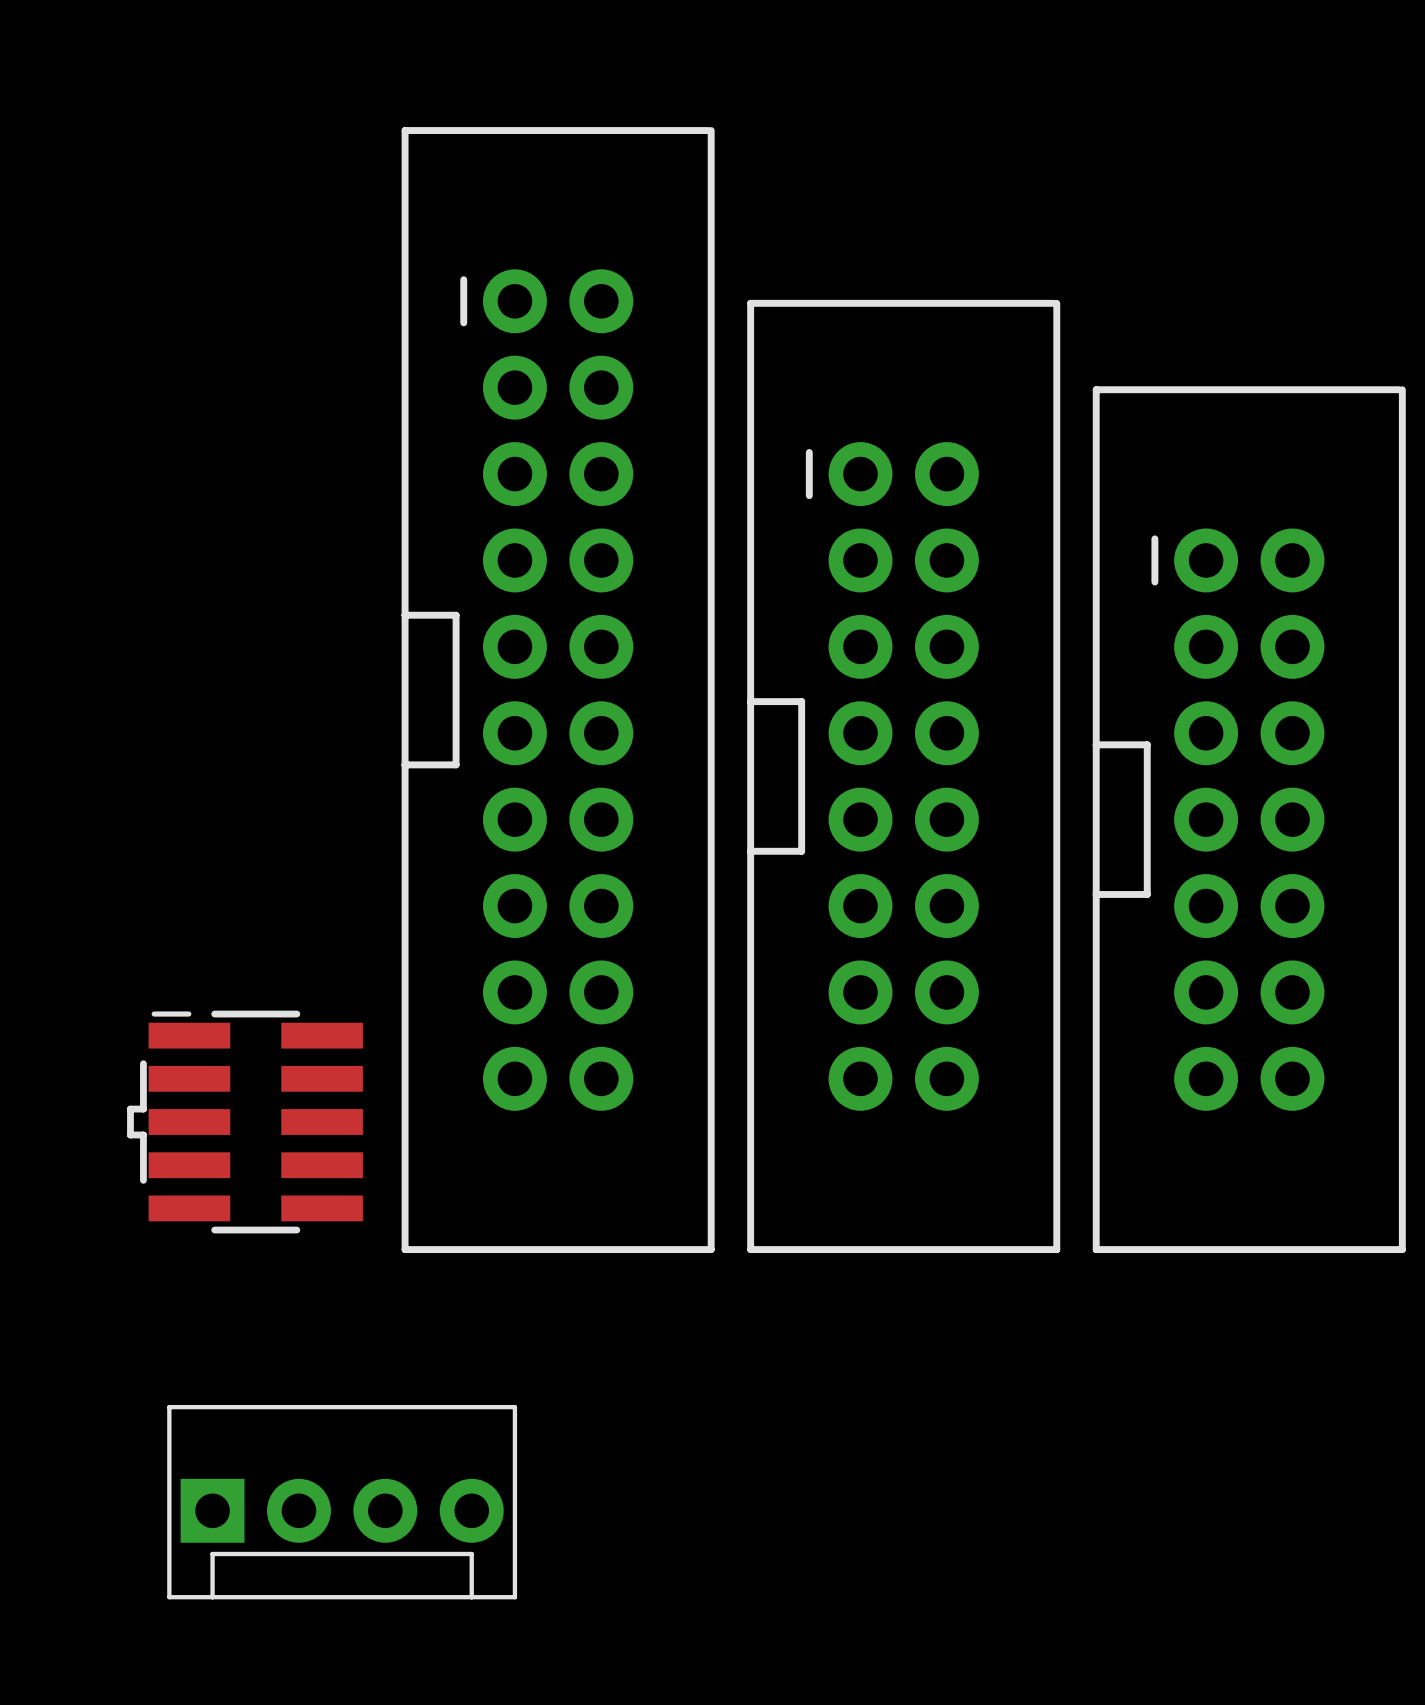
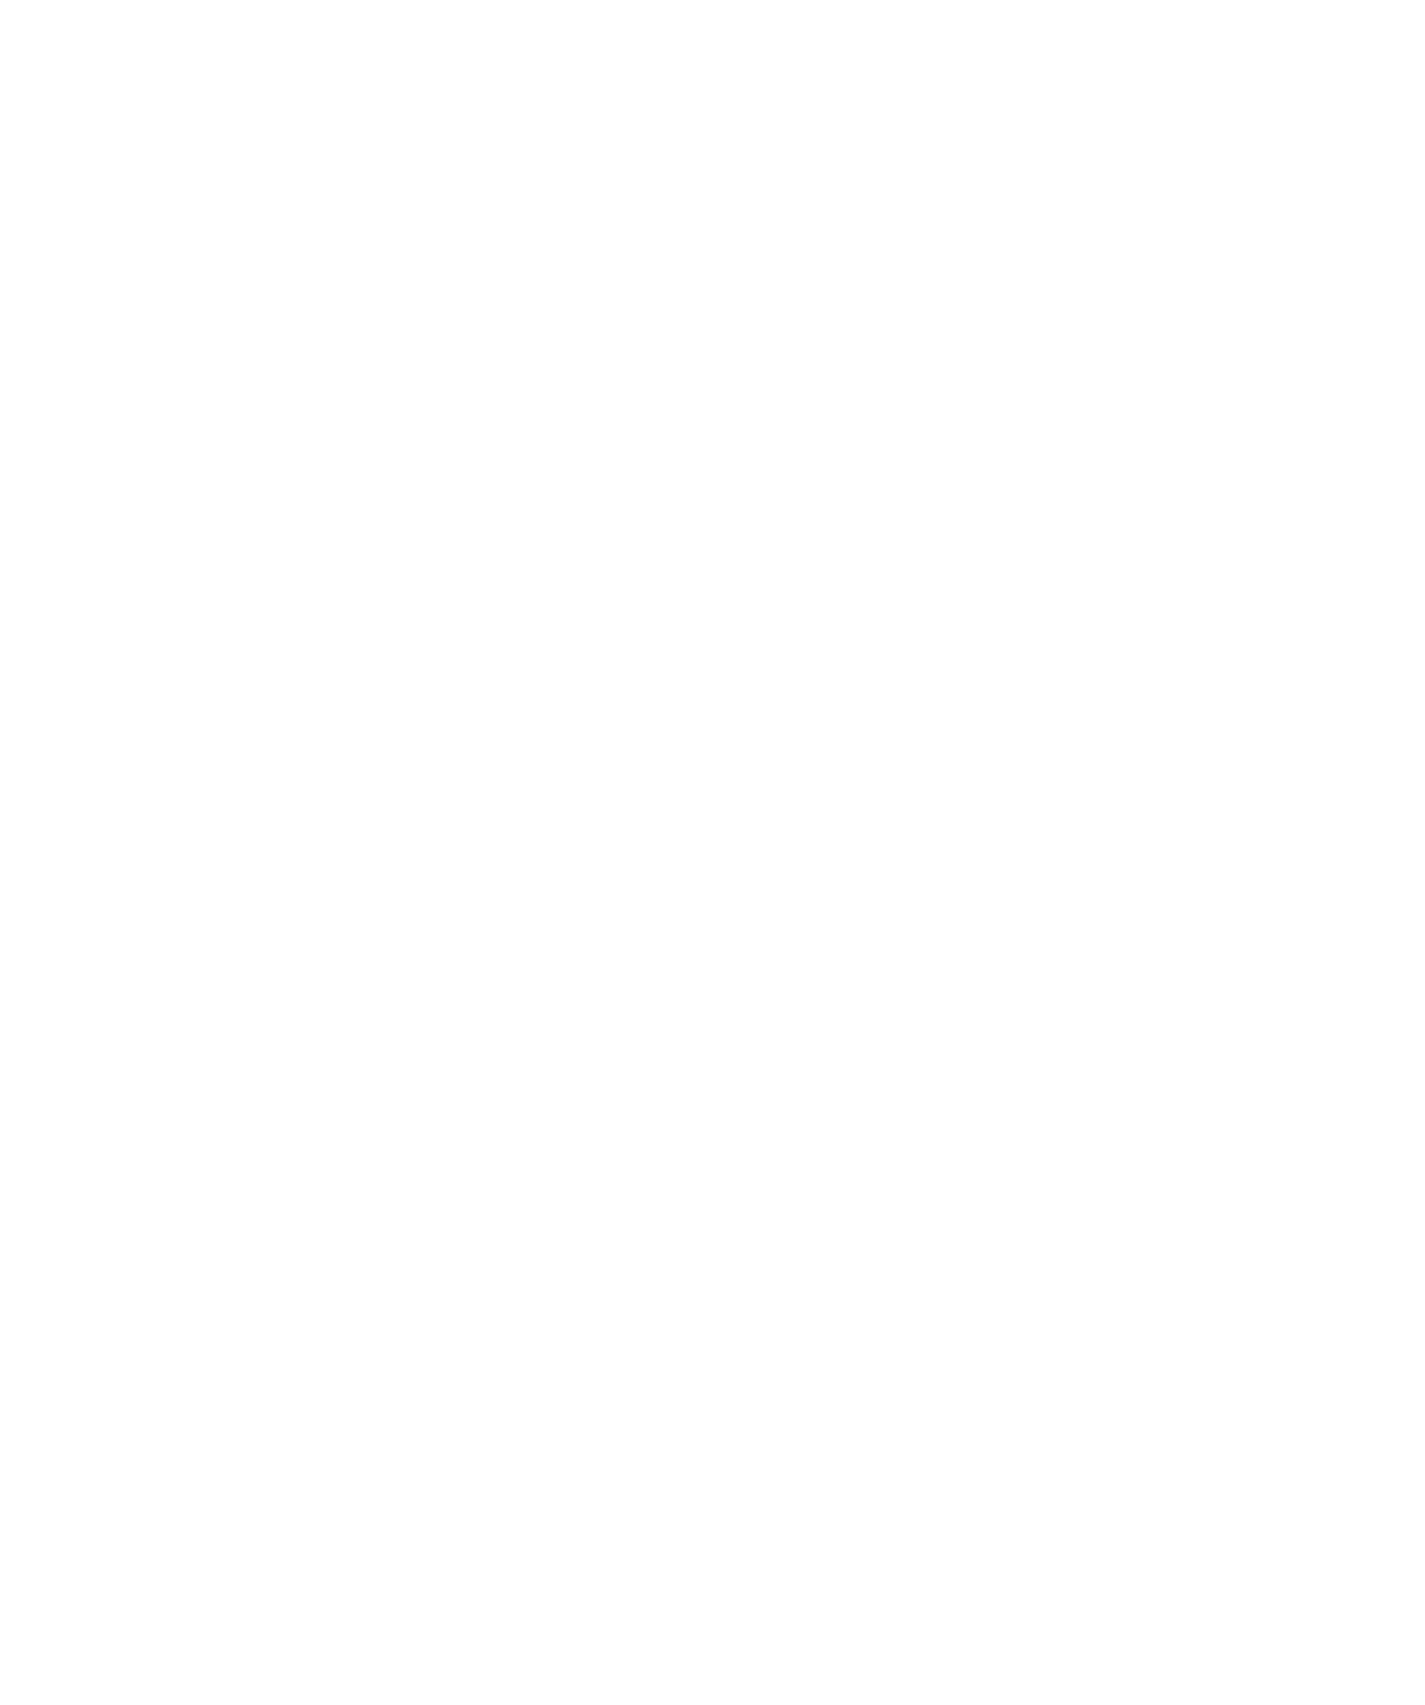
part: (558, 690) -> none
part: (903, 776) -> none
part: (1249, 819) -> none
part: (244, 1122) -> none
part: (342, 1502) -> none

